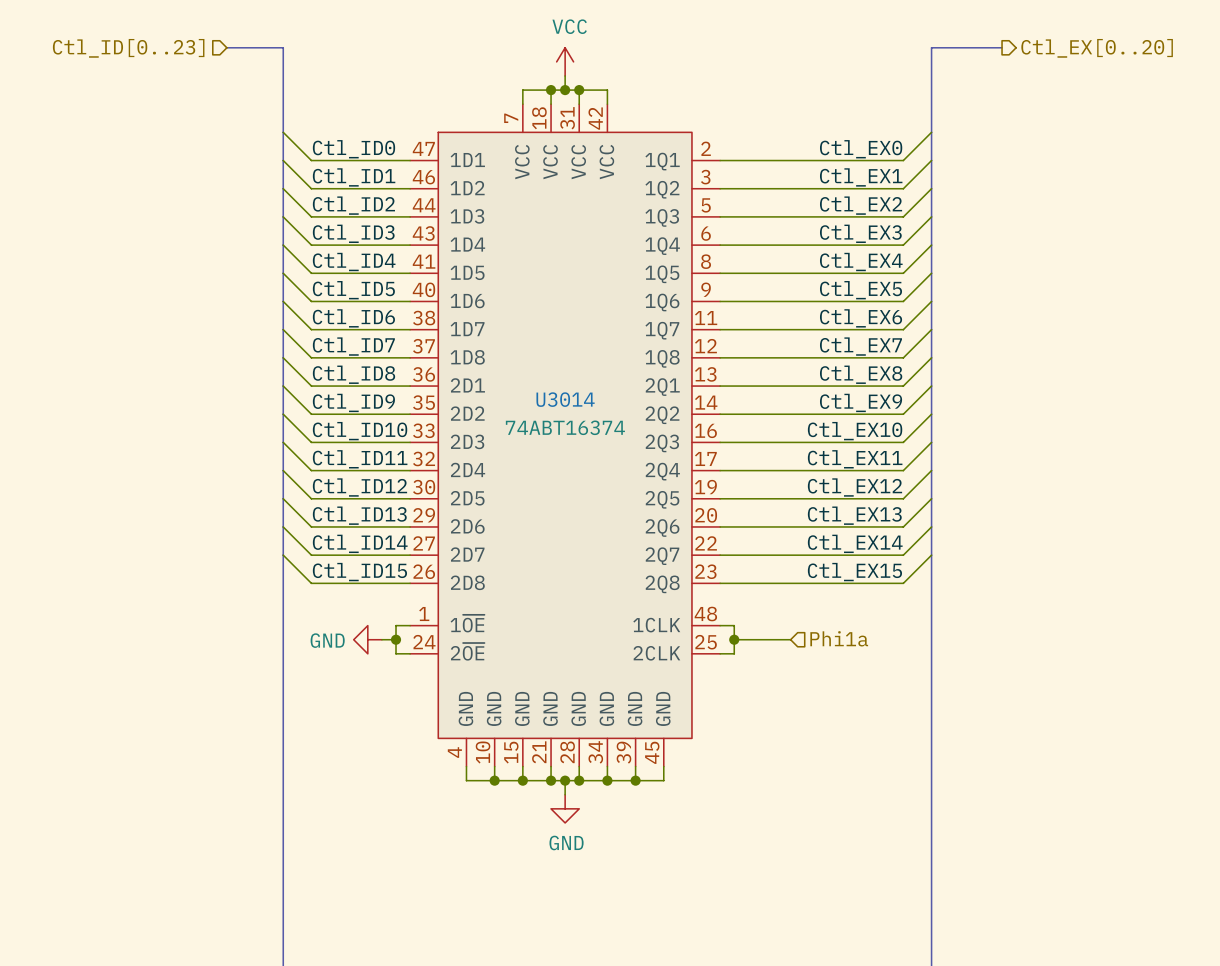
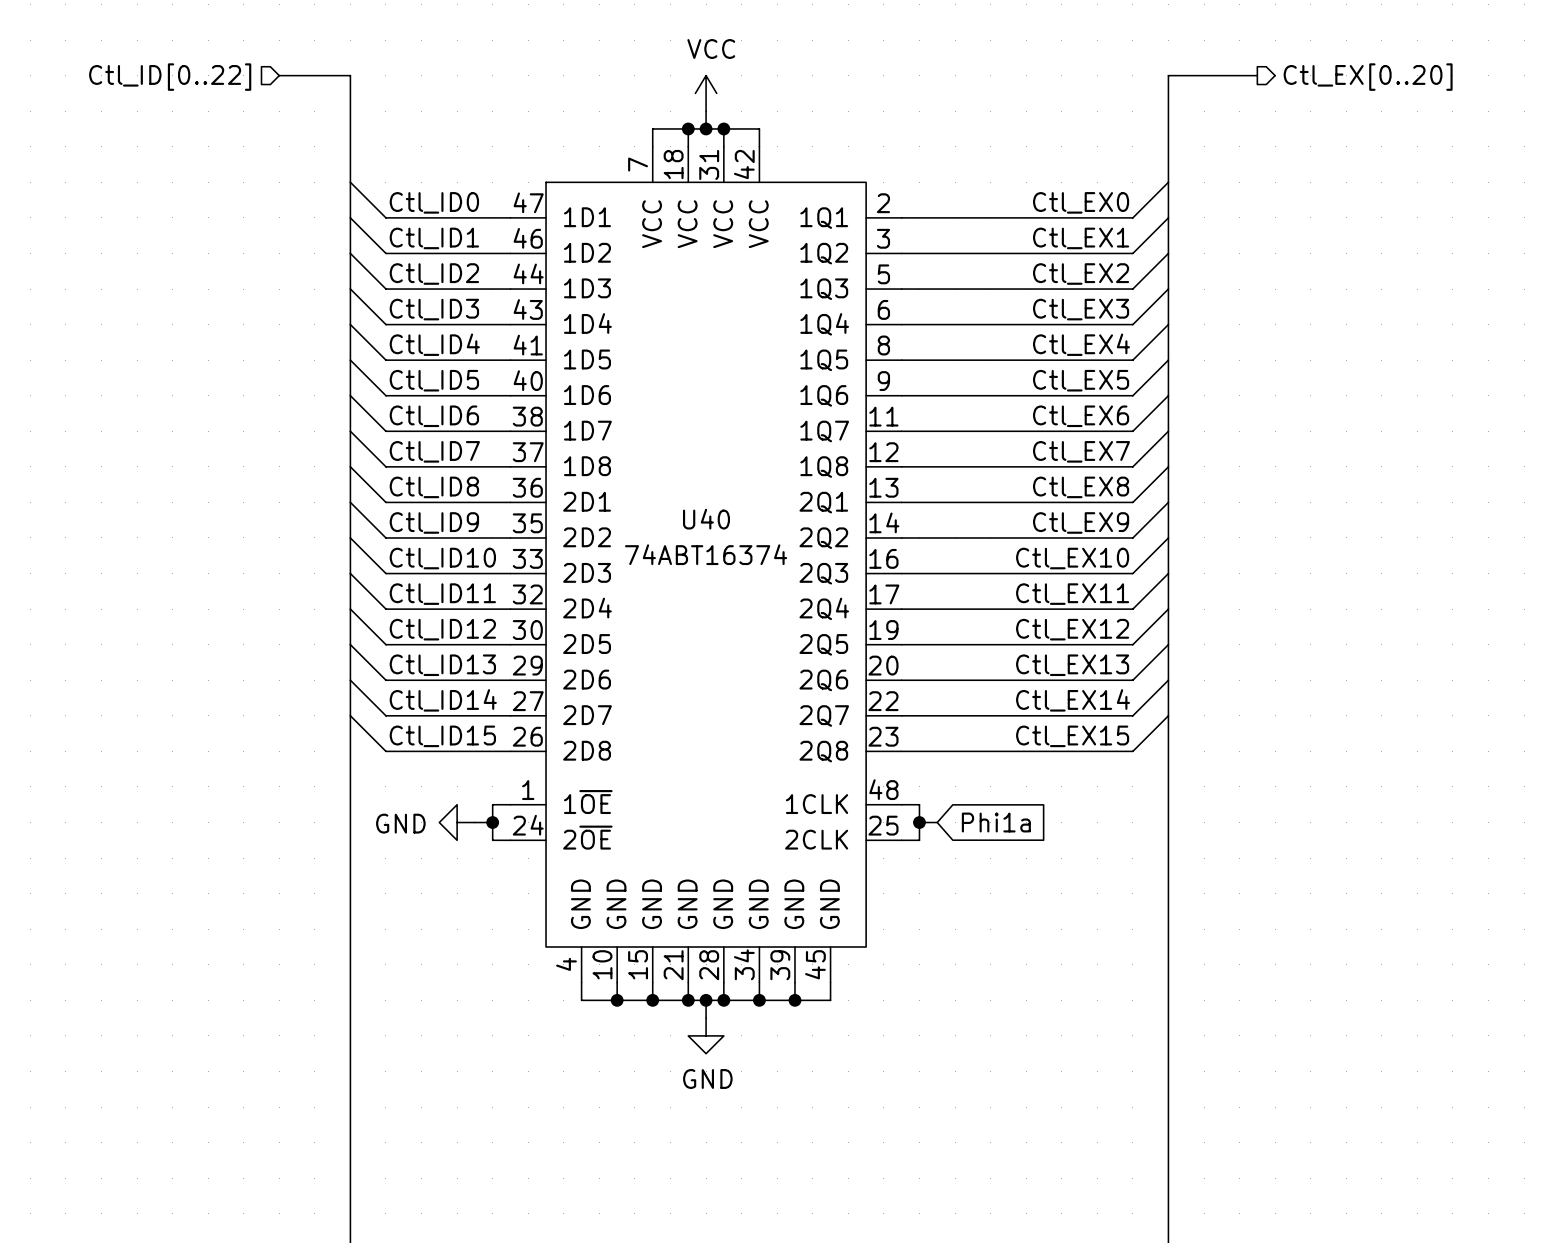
hierarchical label: Ctl_ID[0..23] (128, 48) -> Ctl_ID[0..22] (170, 77)
U3014 name: U3014 (565, 399) -> U40 (706, 519)
hierarchical label: Phi1a (839, 638) -> none
wire: (748, 639) (790, 639) -> none
global label: none -> Phi1a (996, 822)

